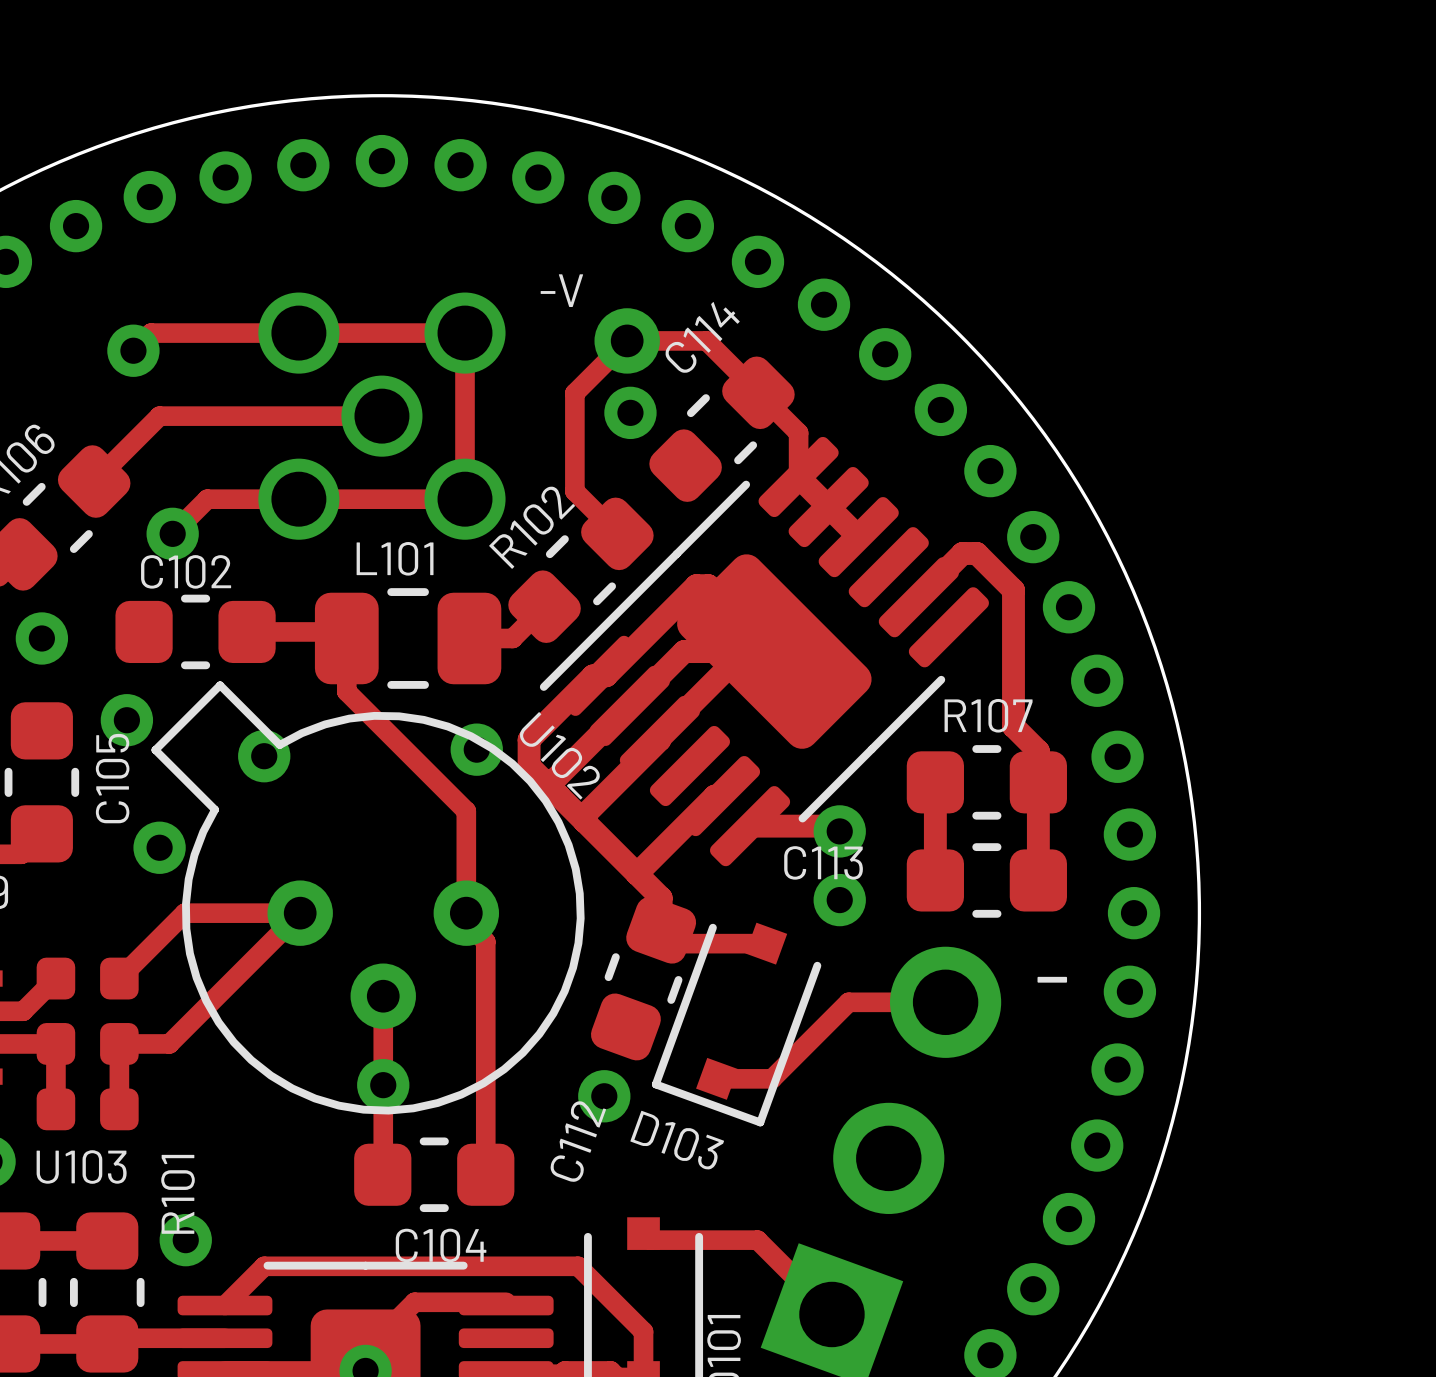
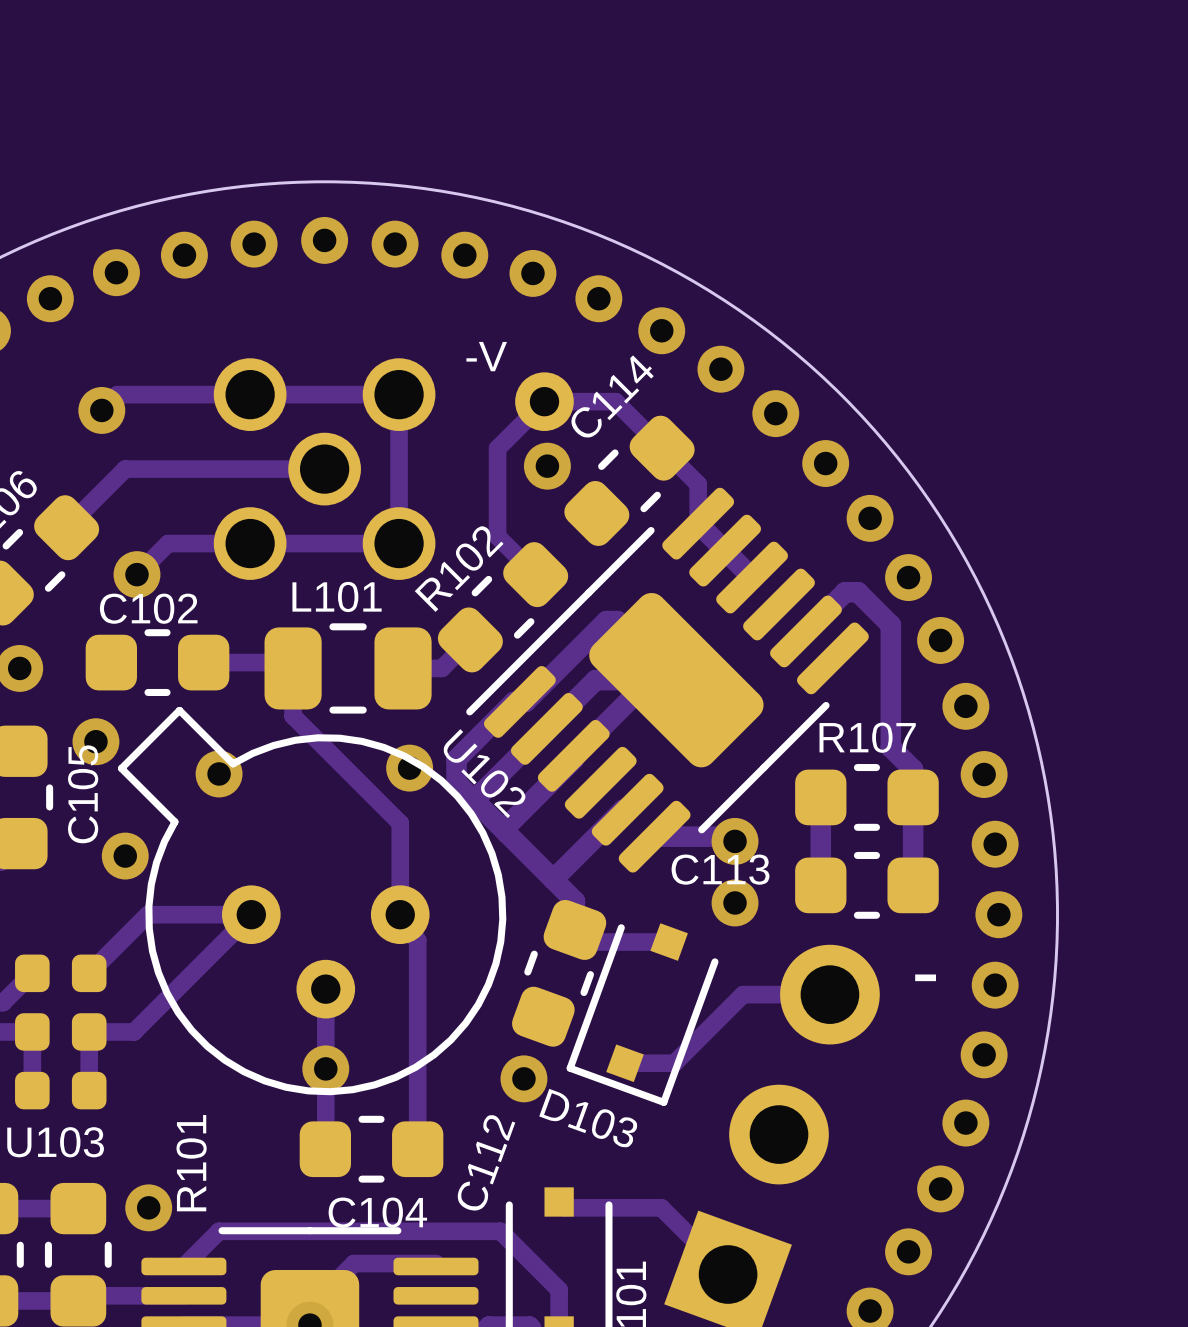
C112 name position: C112 (578, 1141) -> C112 (485, 1162)
R101 name position: R101 (178, 1194) -> R101 (191, 1163)

